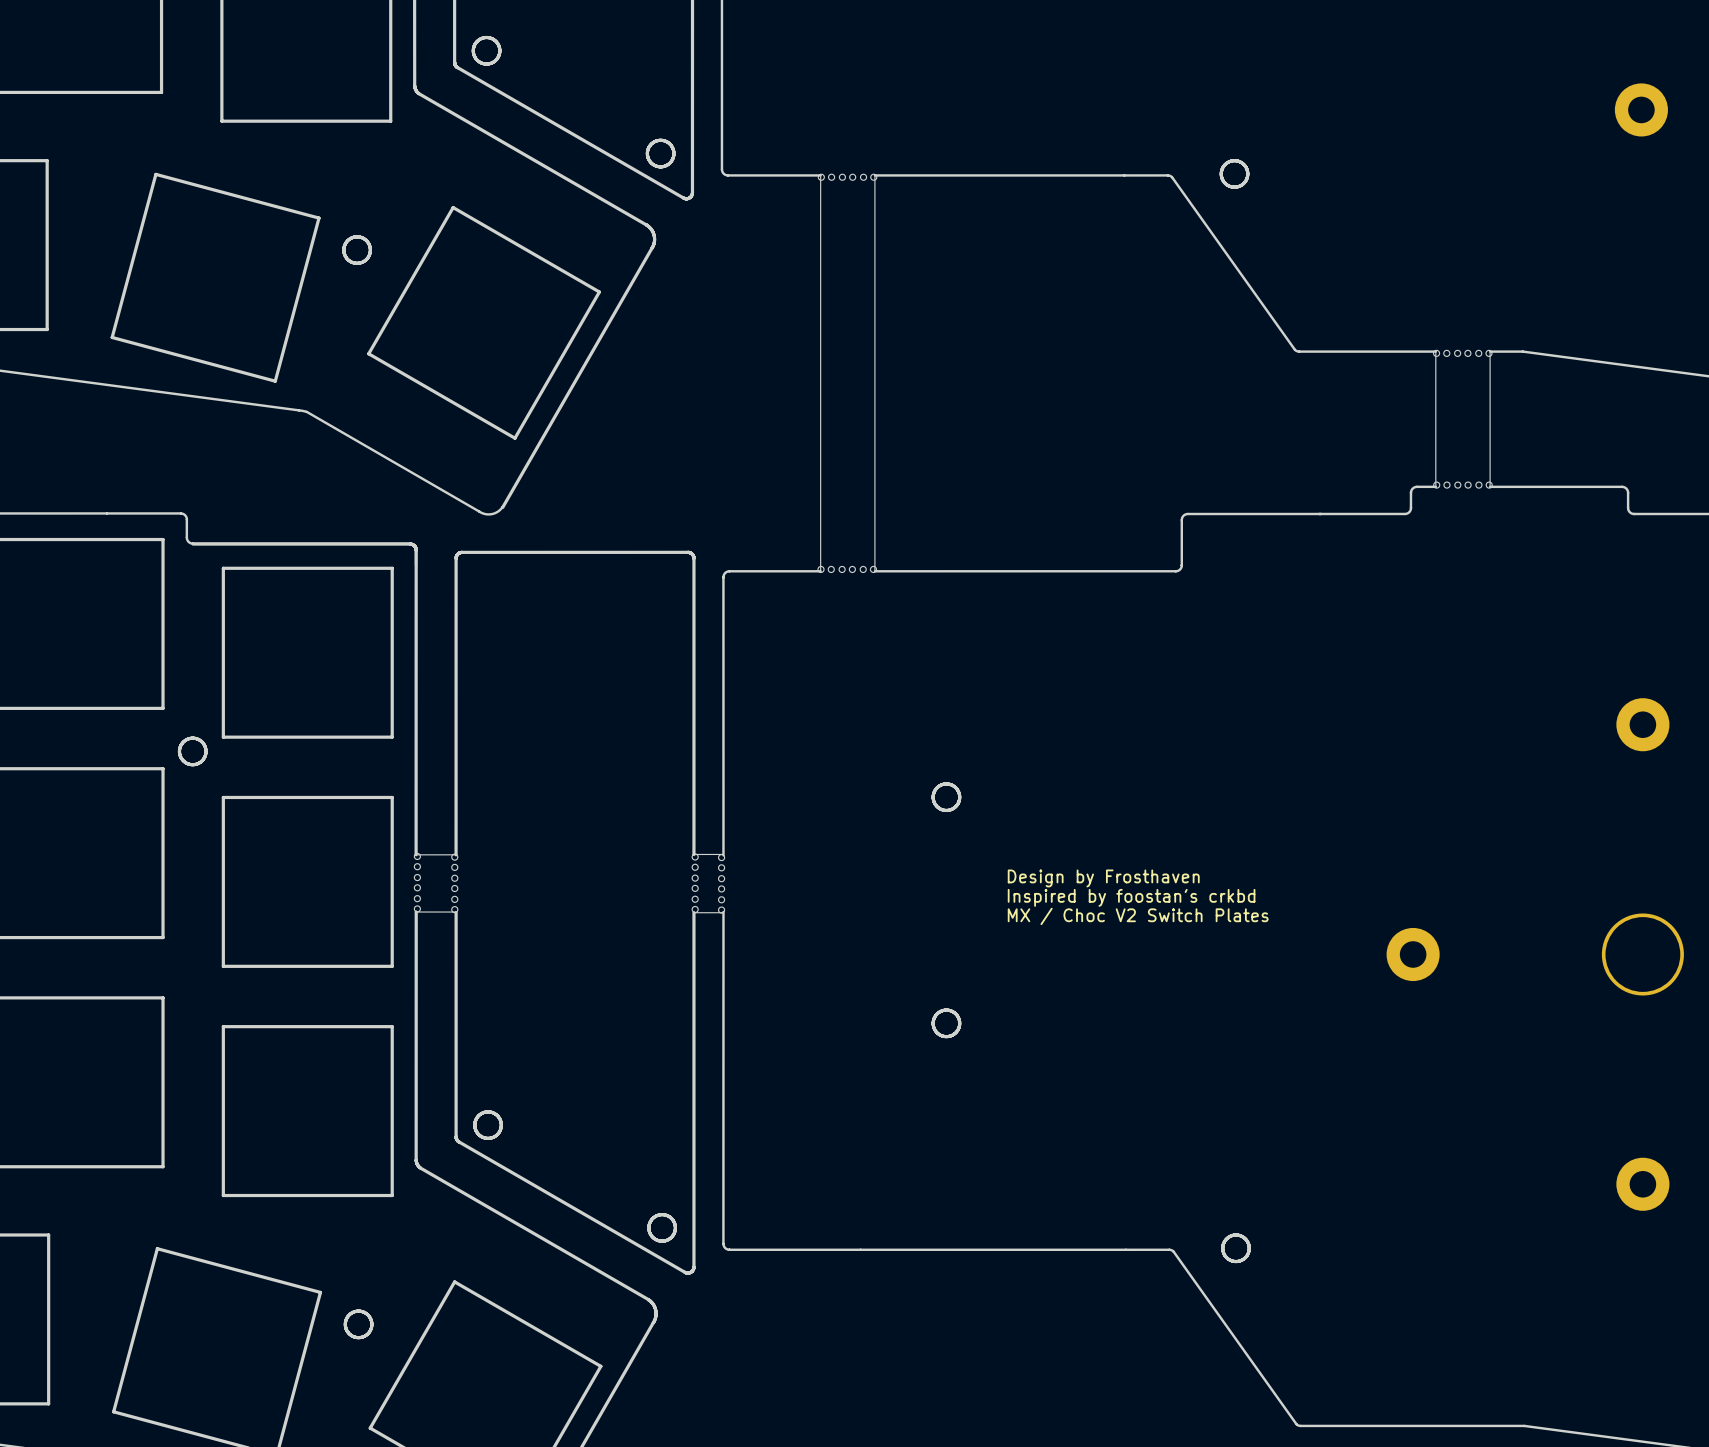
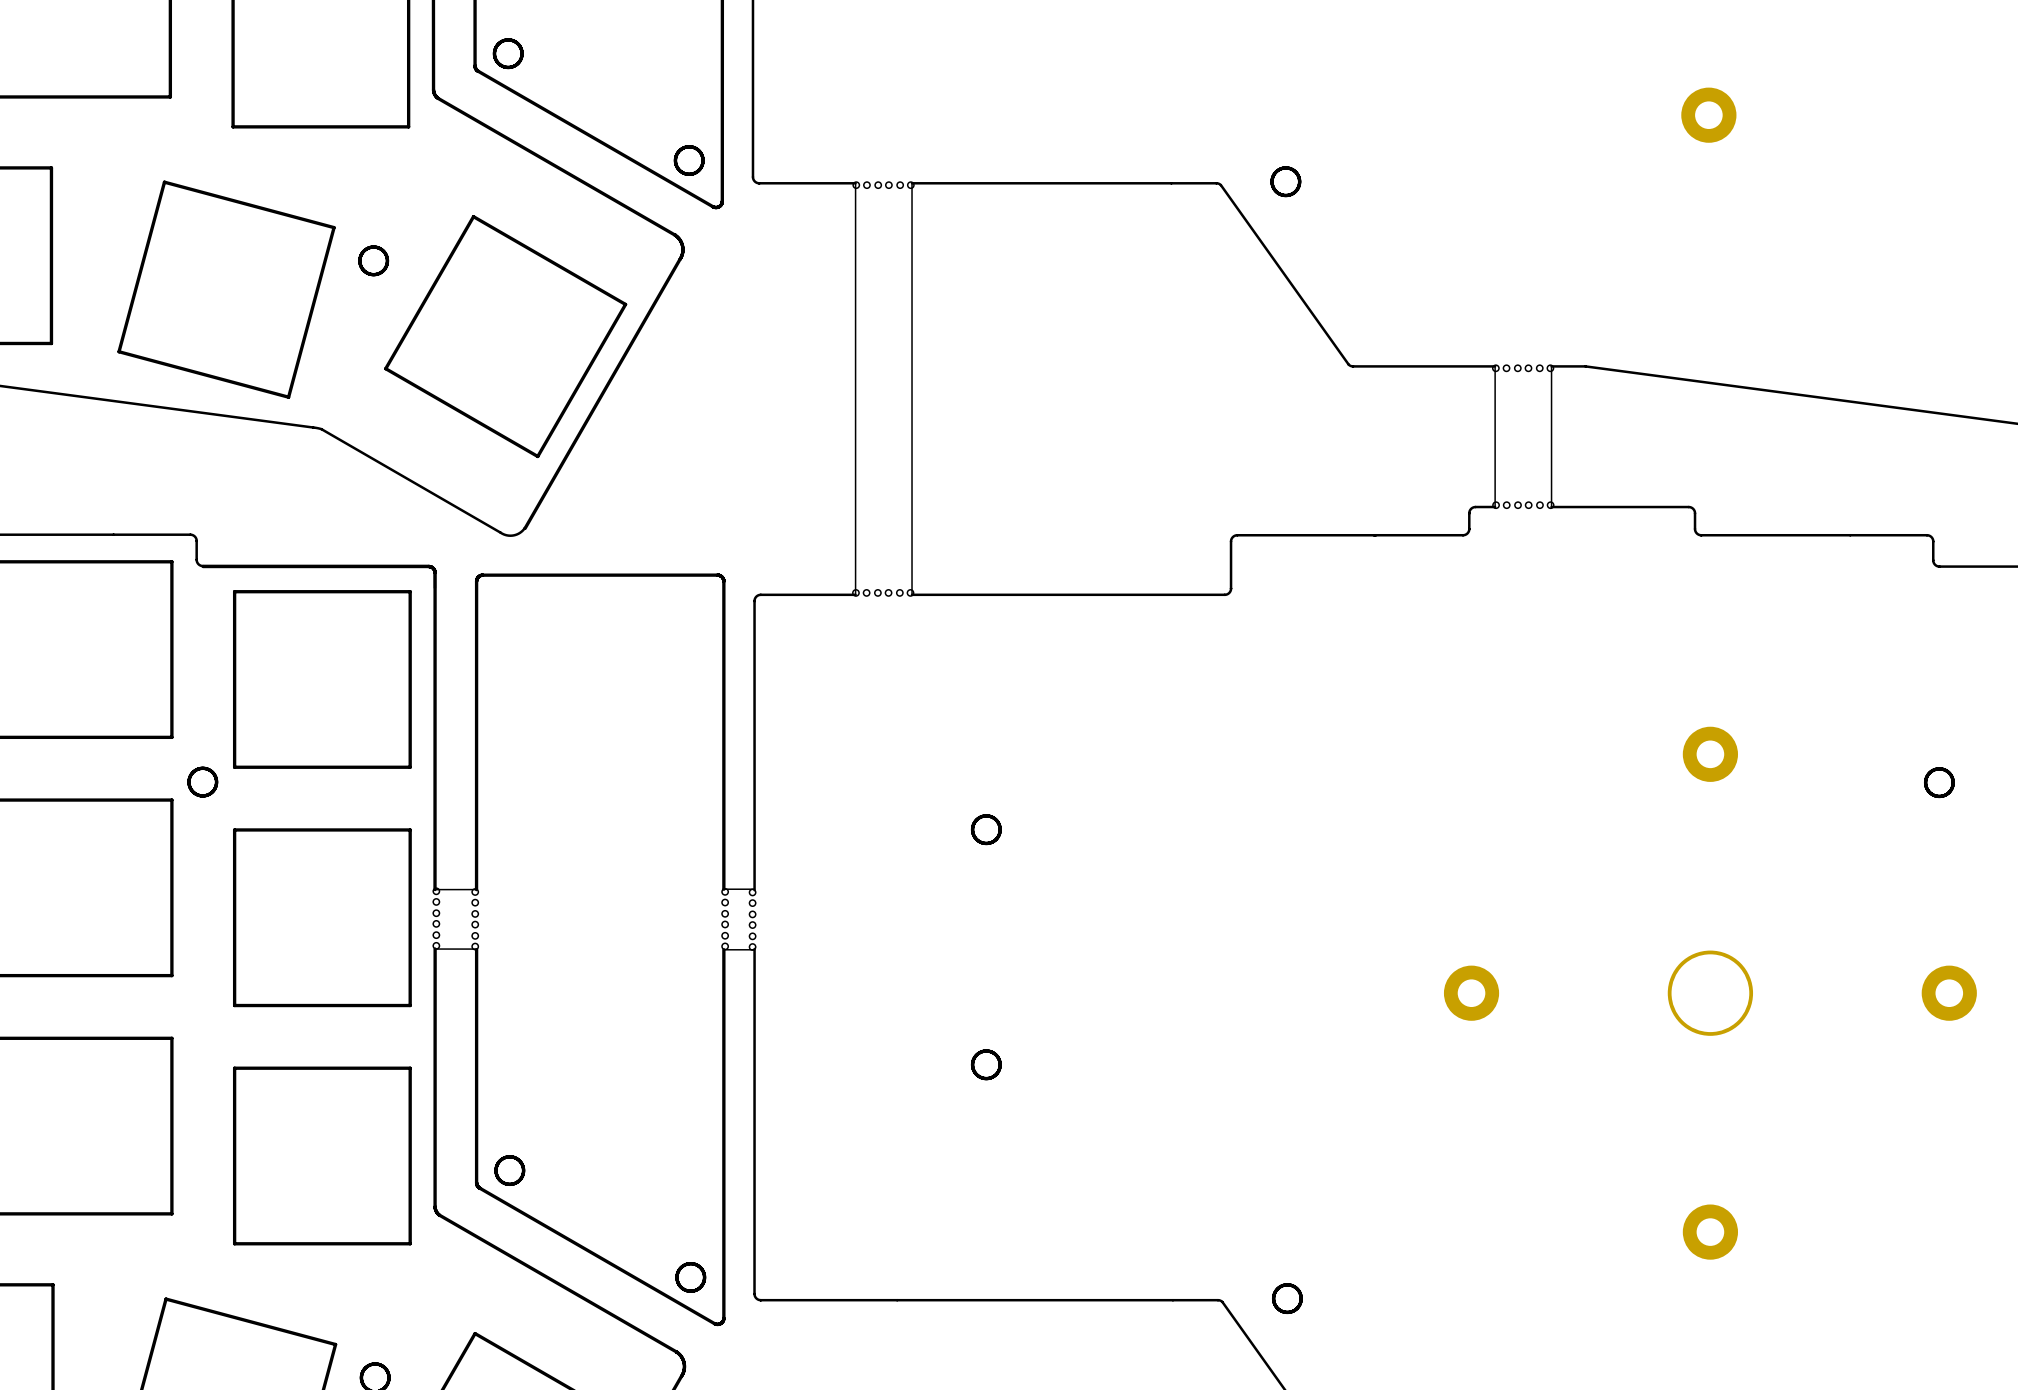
text: Design by Frosthaven (1103, 878) -> none
text: Inspired by foostan's crkbd (1131, 897) -> none
text: MX / Choc V2 Switch Plates (1138, 916) -> none

